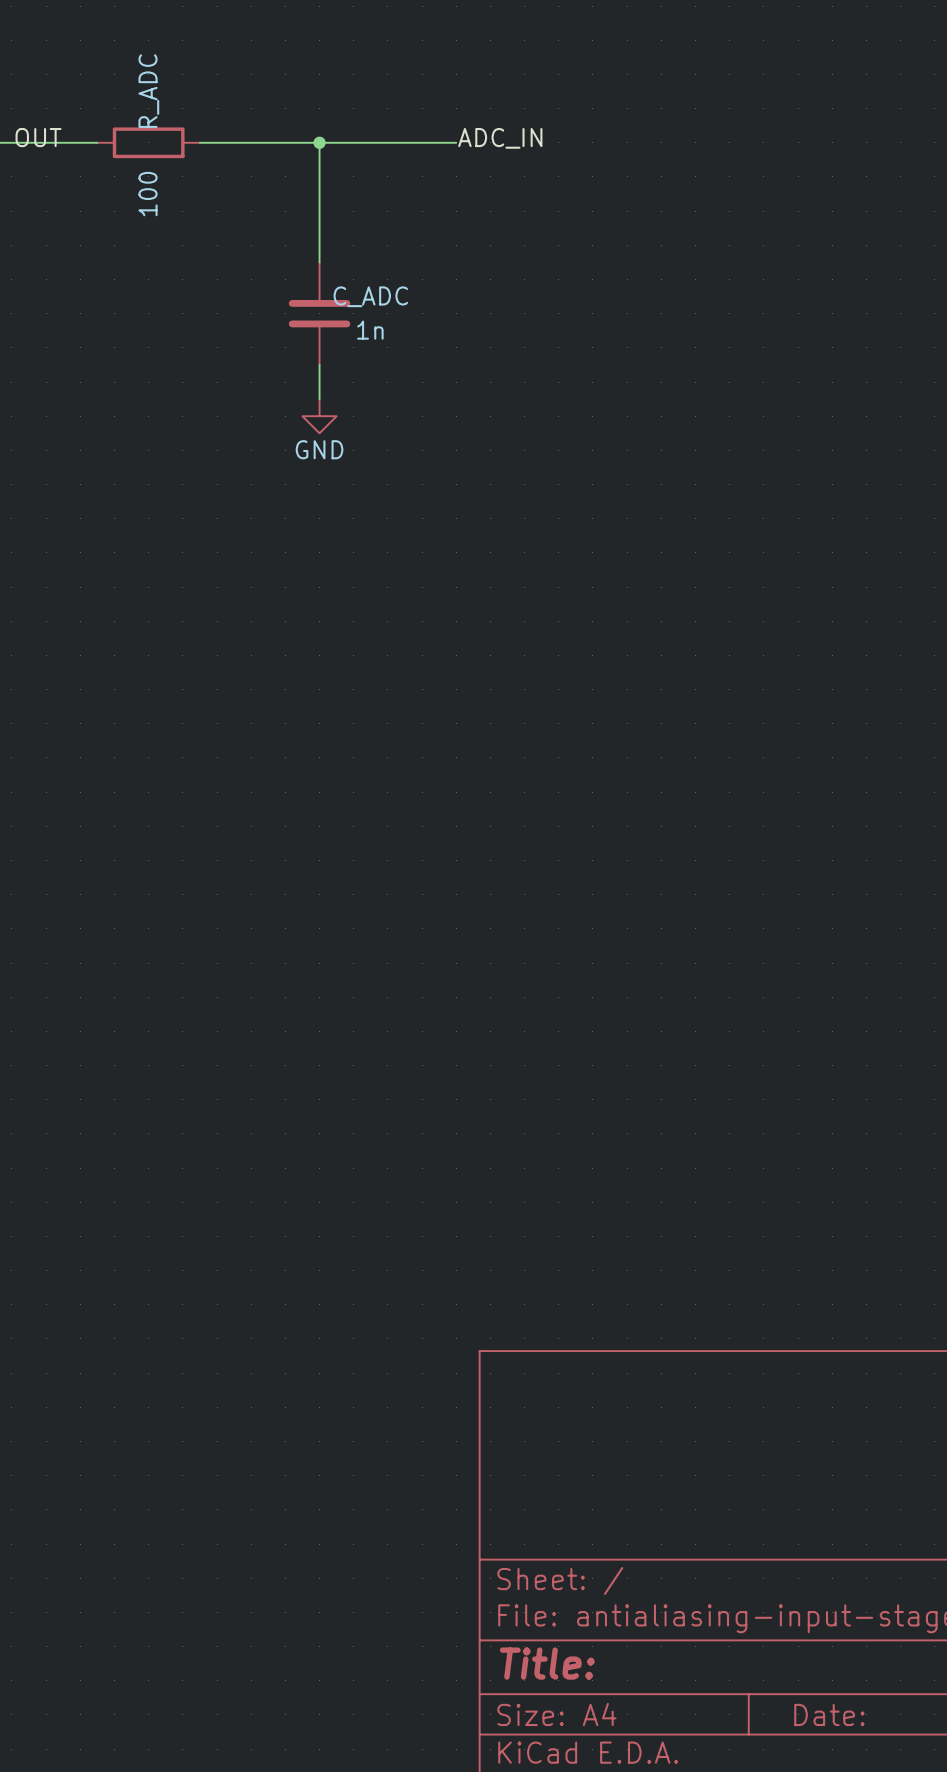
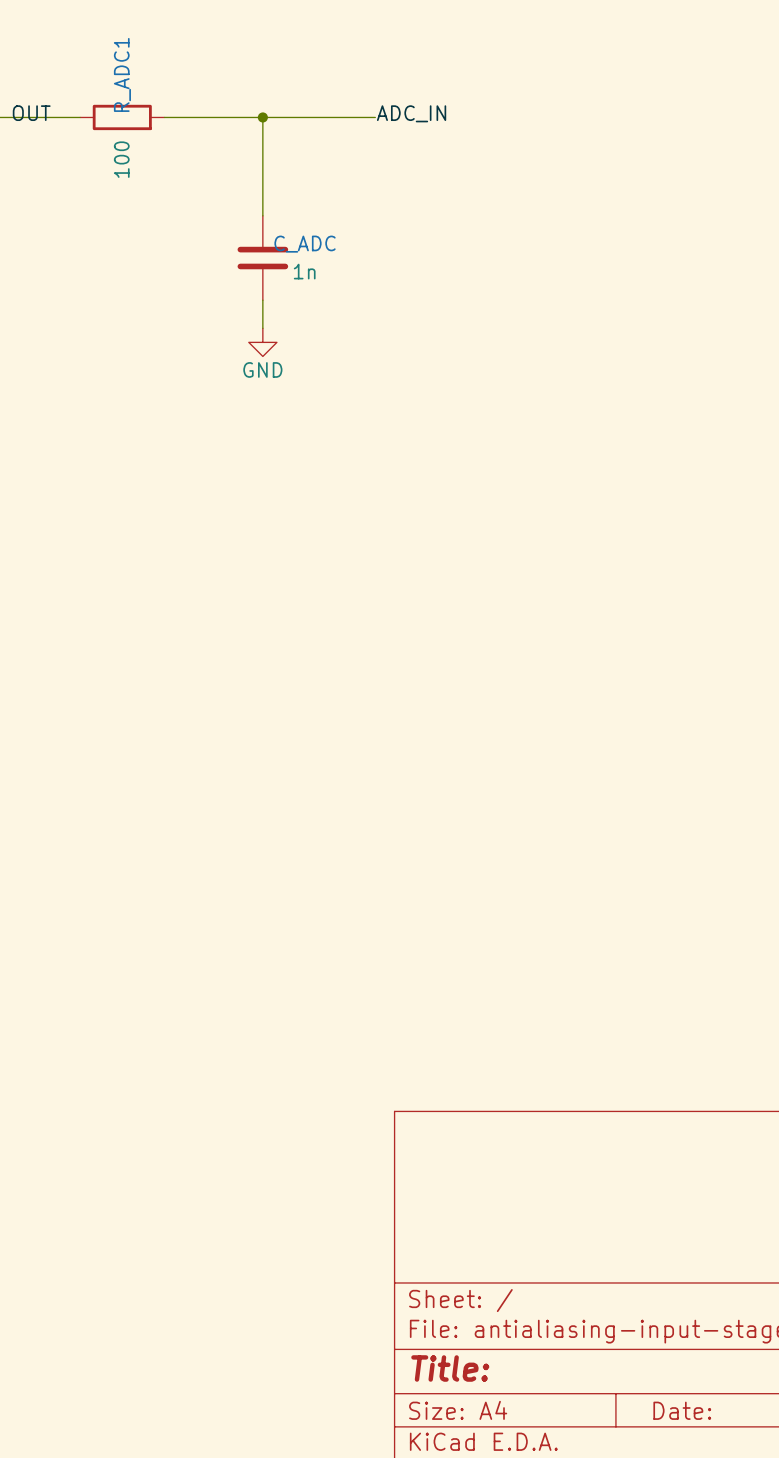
R_ADC name: R_ADC (148, 91) -> R_ADC1 (122, 74)

